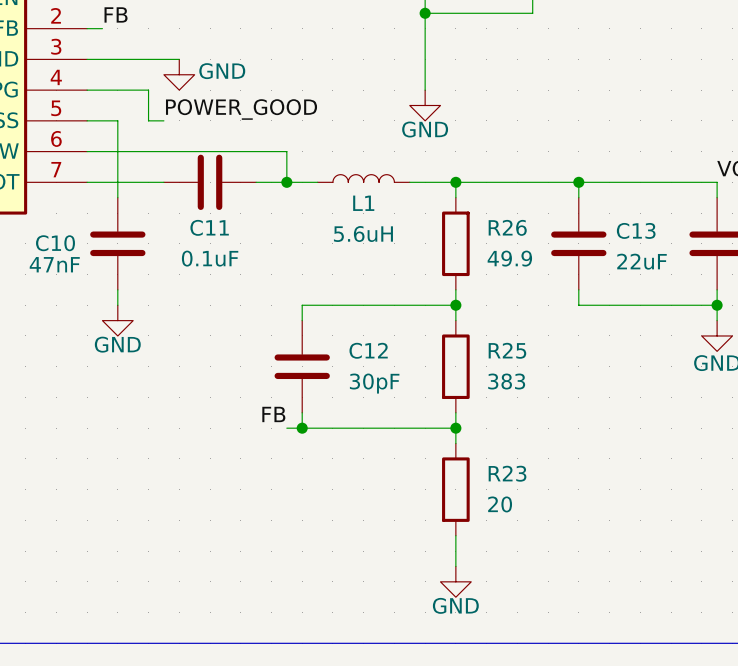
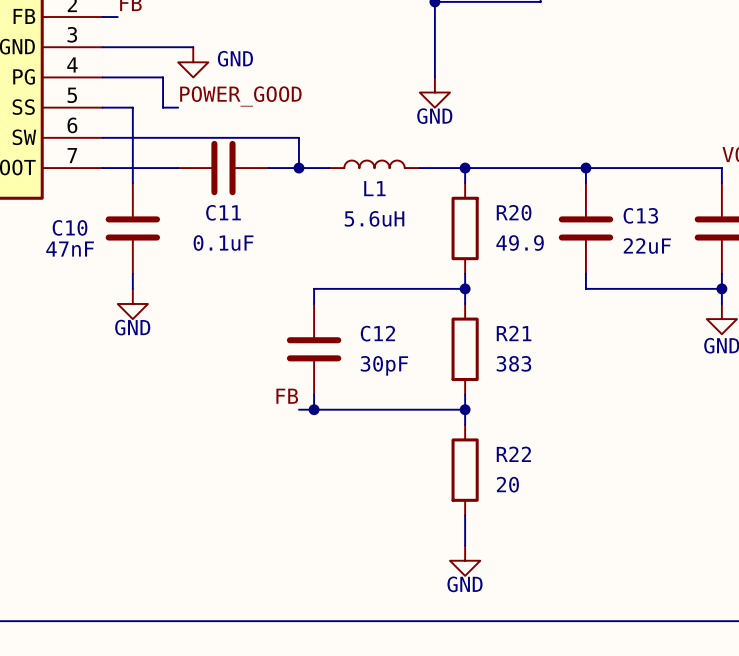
R26 name: R26 (507, 227) -> R20 (514, 212)
R25 name: R25 (507, 350) -> R21 (514, 333)
R23 name: R23 (507, 473) -> R22 (513, 454)

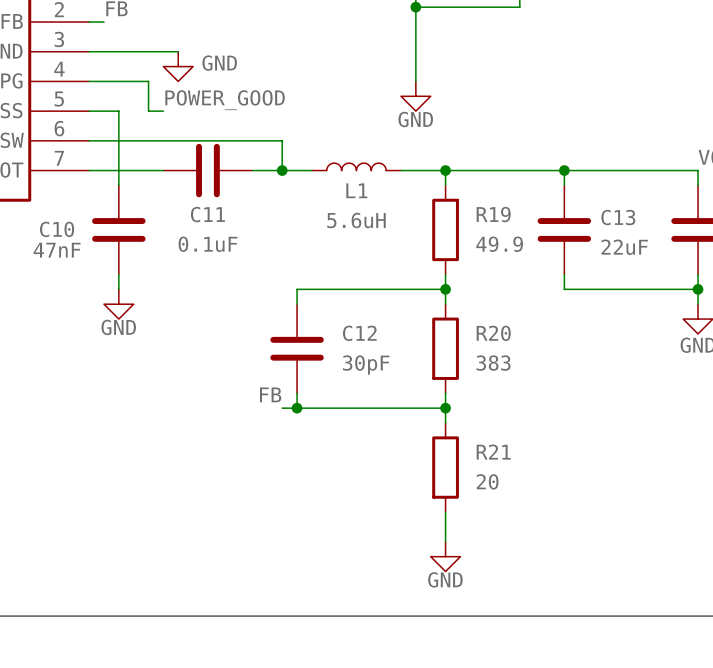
R20 name: R20 (514, 212) -> R19 (493, 214)
R21 name: R21 (514, 333) -> R20 (493, 333)
R22 name: R22 (513, 454) -> R21 (493, 452)

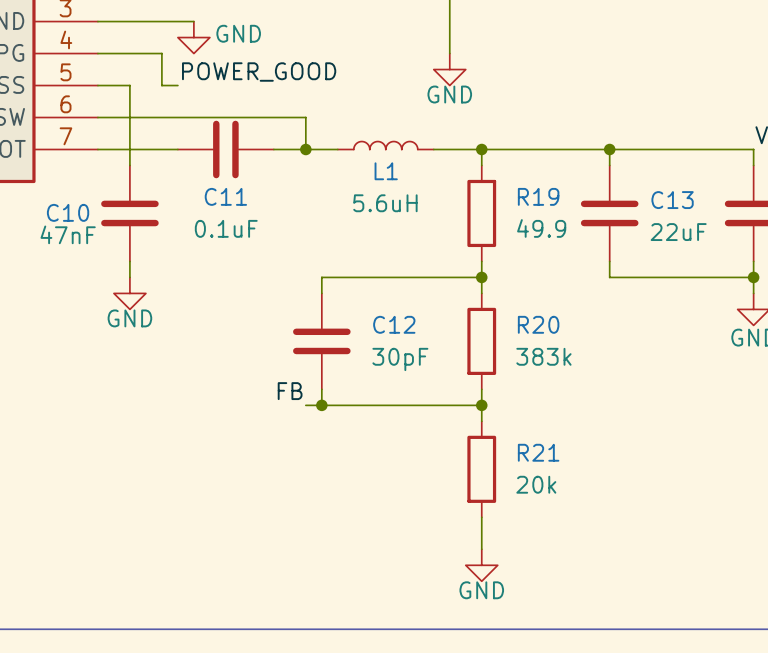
R20 value: 383 (493, 363) -> 383k (543, 356)
R21 value: 20 (487, 481) -> 20k (536, 484)

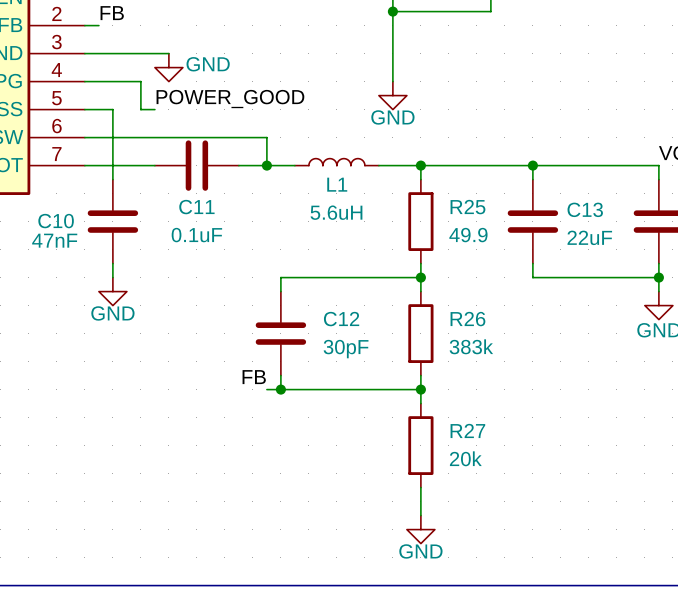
R19 name: R19 (538, 196) -> R25 (467, 207)
R20 name: R20 (538, 324) -> R26 (467, 319)
R21 name: R21 (538, 452) -> R27 (467, 430)

